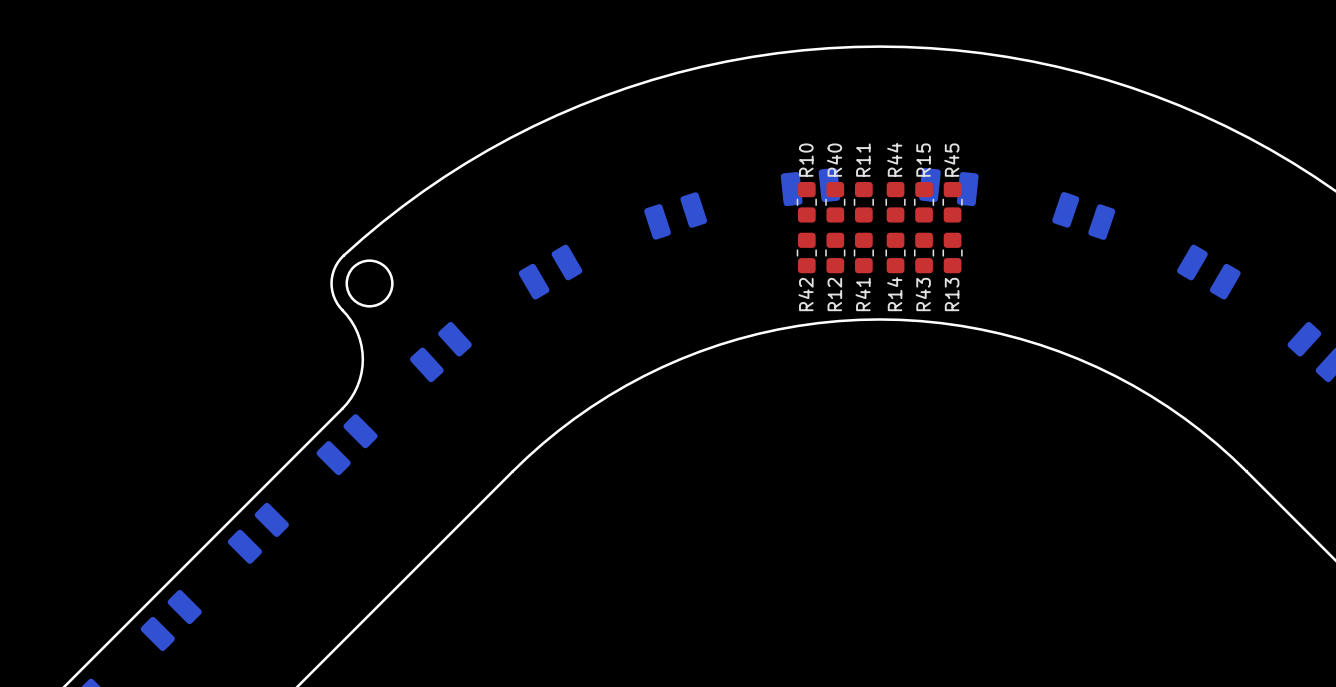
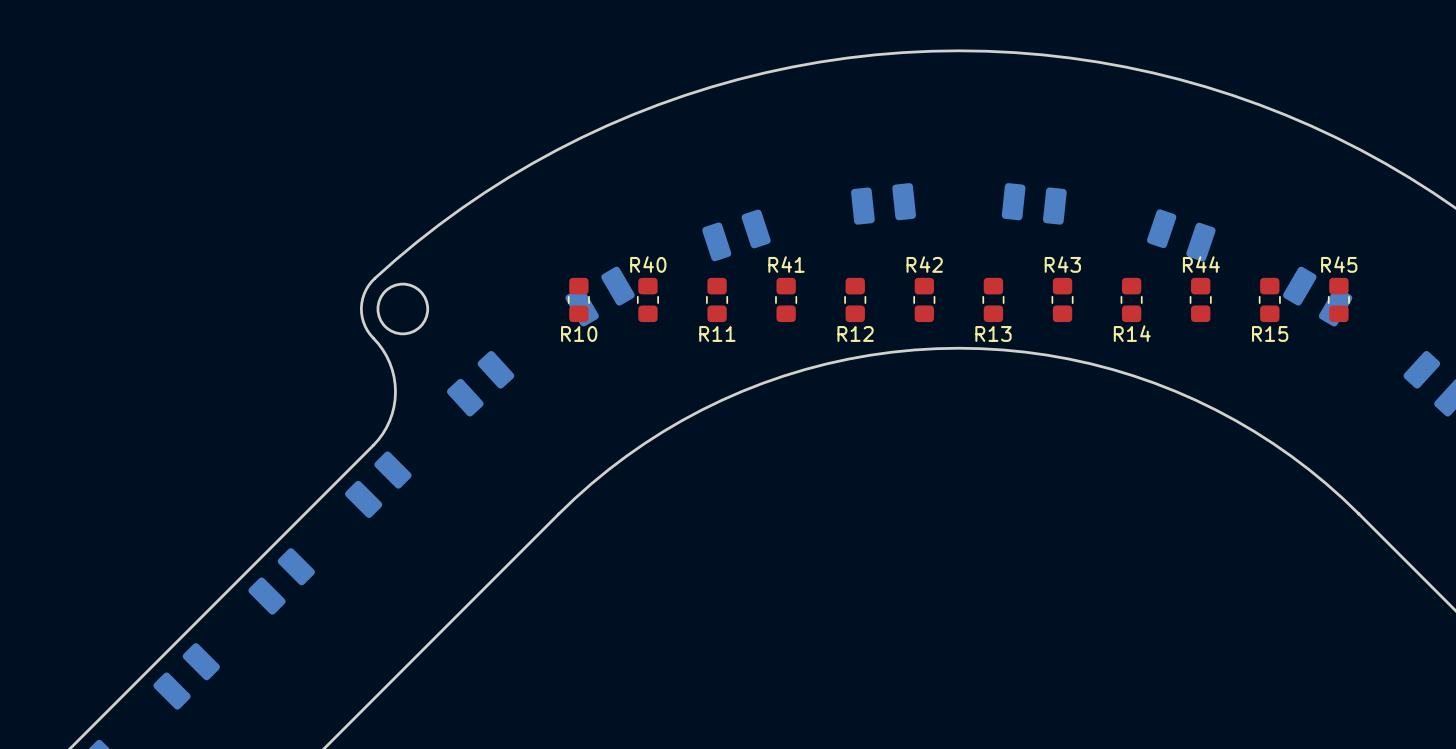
R44 name rotation: 0° (894, 159) -> 90° clockwise (1201, 264)
R10 name rotation: 0° (806, 160) -> 90° clockwise (579, 333)
R10 name position: R10 (806, 160) -> R10 (579, 333)
R40 name rotation: 0° (834, 160) -> 90° clockwise (648, 264)
R11 name rotation: 0° (863, 160) -> 90° clockwise (717, 333)
R11 name position: R11 (863, 160) -> R11 (717, 333)
R15 name rotation: 0° (923, 160) -> 90° clockwise (1270, 333)
R15 name position: R15 (923, 160) -> R15 (1270, 333)
R45 name rotation: 0° (951, 160) -> 90° clockwise (1339, 264)
R10 position: (806, 202) -> (578, 299)
R40 position: (835, 202) -> (647, 299)
R11 position: (863, 202) -> (717, 299)
R44 position: (895, 202) -> (1200, 299)
R15 position: (924, 202) -> (1269, 299)
R45 position: (952, 202) -> (1338, 299)
R42 position: (806, 252) -> (924, 299)
R12 position: (835, 252) -> (855, 299)
R41 position: (863, 252) -> (786, 299)
R14 position: (895, 252) -> (1131, 299)
R43 position: (924, 252) -> (1062, 299)
R13 position: (952, 252) -> (993, 299)
R42 name rotation: 0° (806, 294) -> 90° clockwise (924, 264)
R42 name position: R42 (806, 294) -> R42 (924, 264)
R12 name rotation: 0° (834, 294) -> 90° clockwise (855, 333)
R41 name rotation: 0° (863, 294) -> 90° clockwise (786, 264)
R41 name position: R41 (863, 294) -> R41 (786, 264)
R14 name rotation: 0° (894, 294) -> 90° clockwise (1132, 333)
R43 name rotation: 0° (923, 294) -> 90° clockwise (1062, 264)
R43 name position: R43 (923, 294) -> R43 (1062, 264)
R13 name rotation: 0° (952, 294) -> 90° clockwise (993, 333)

